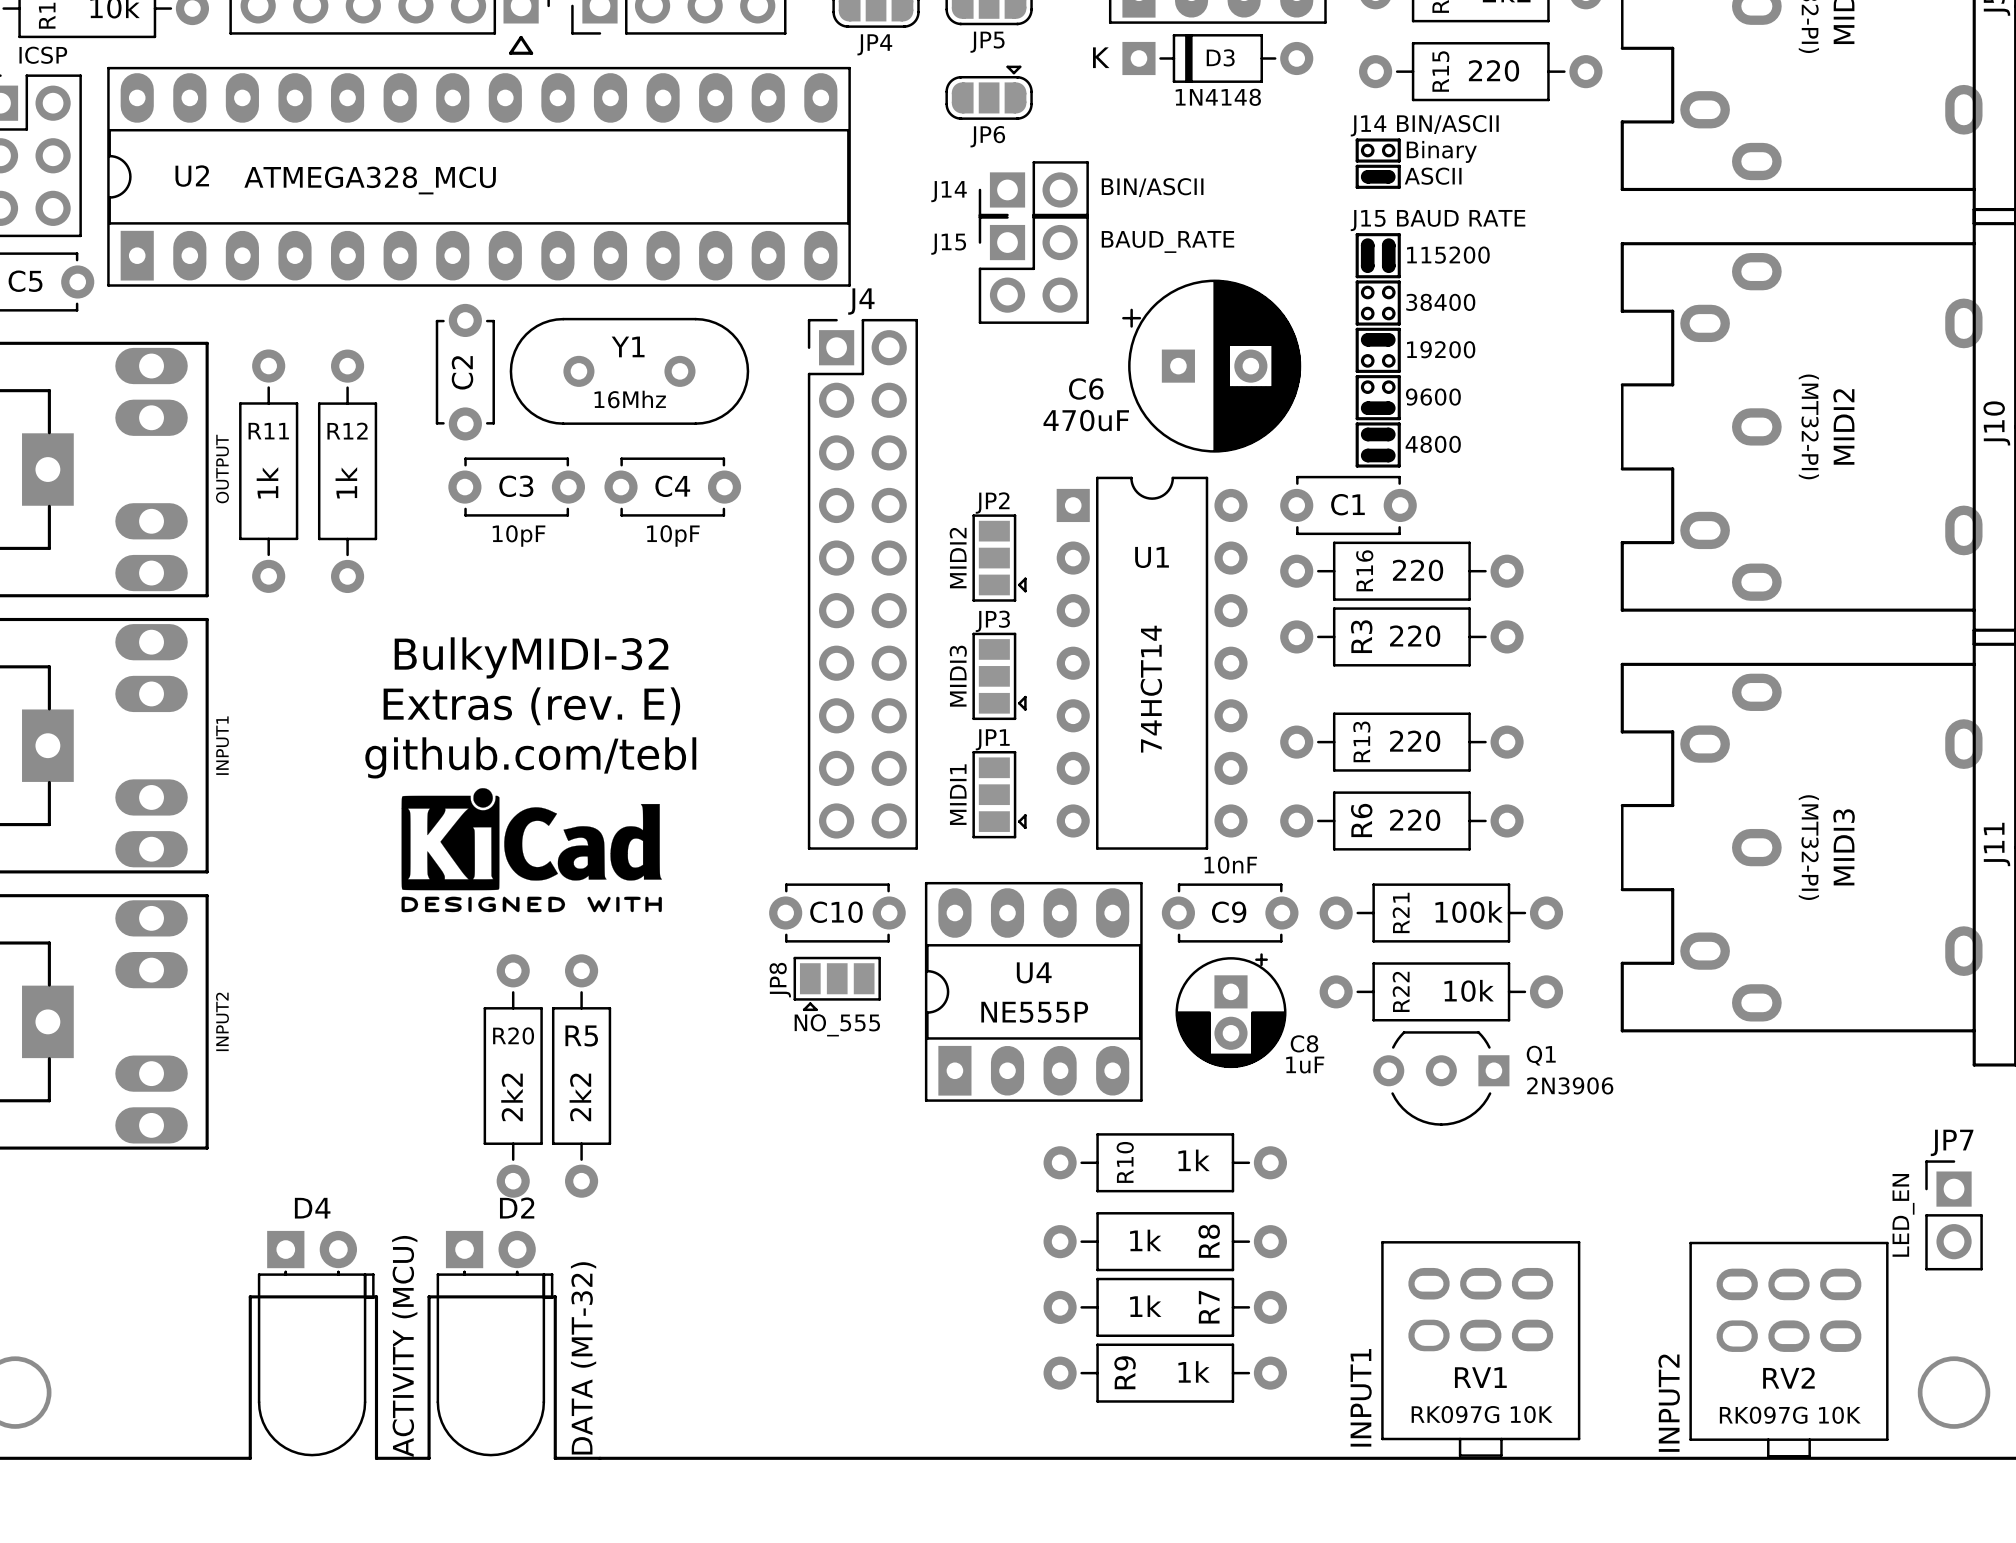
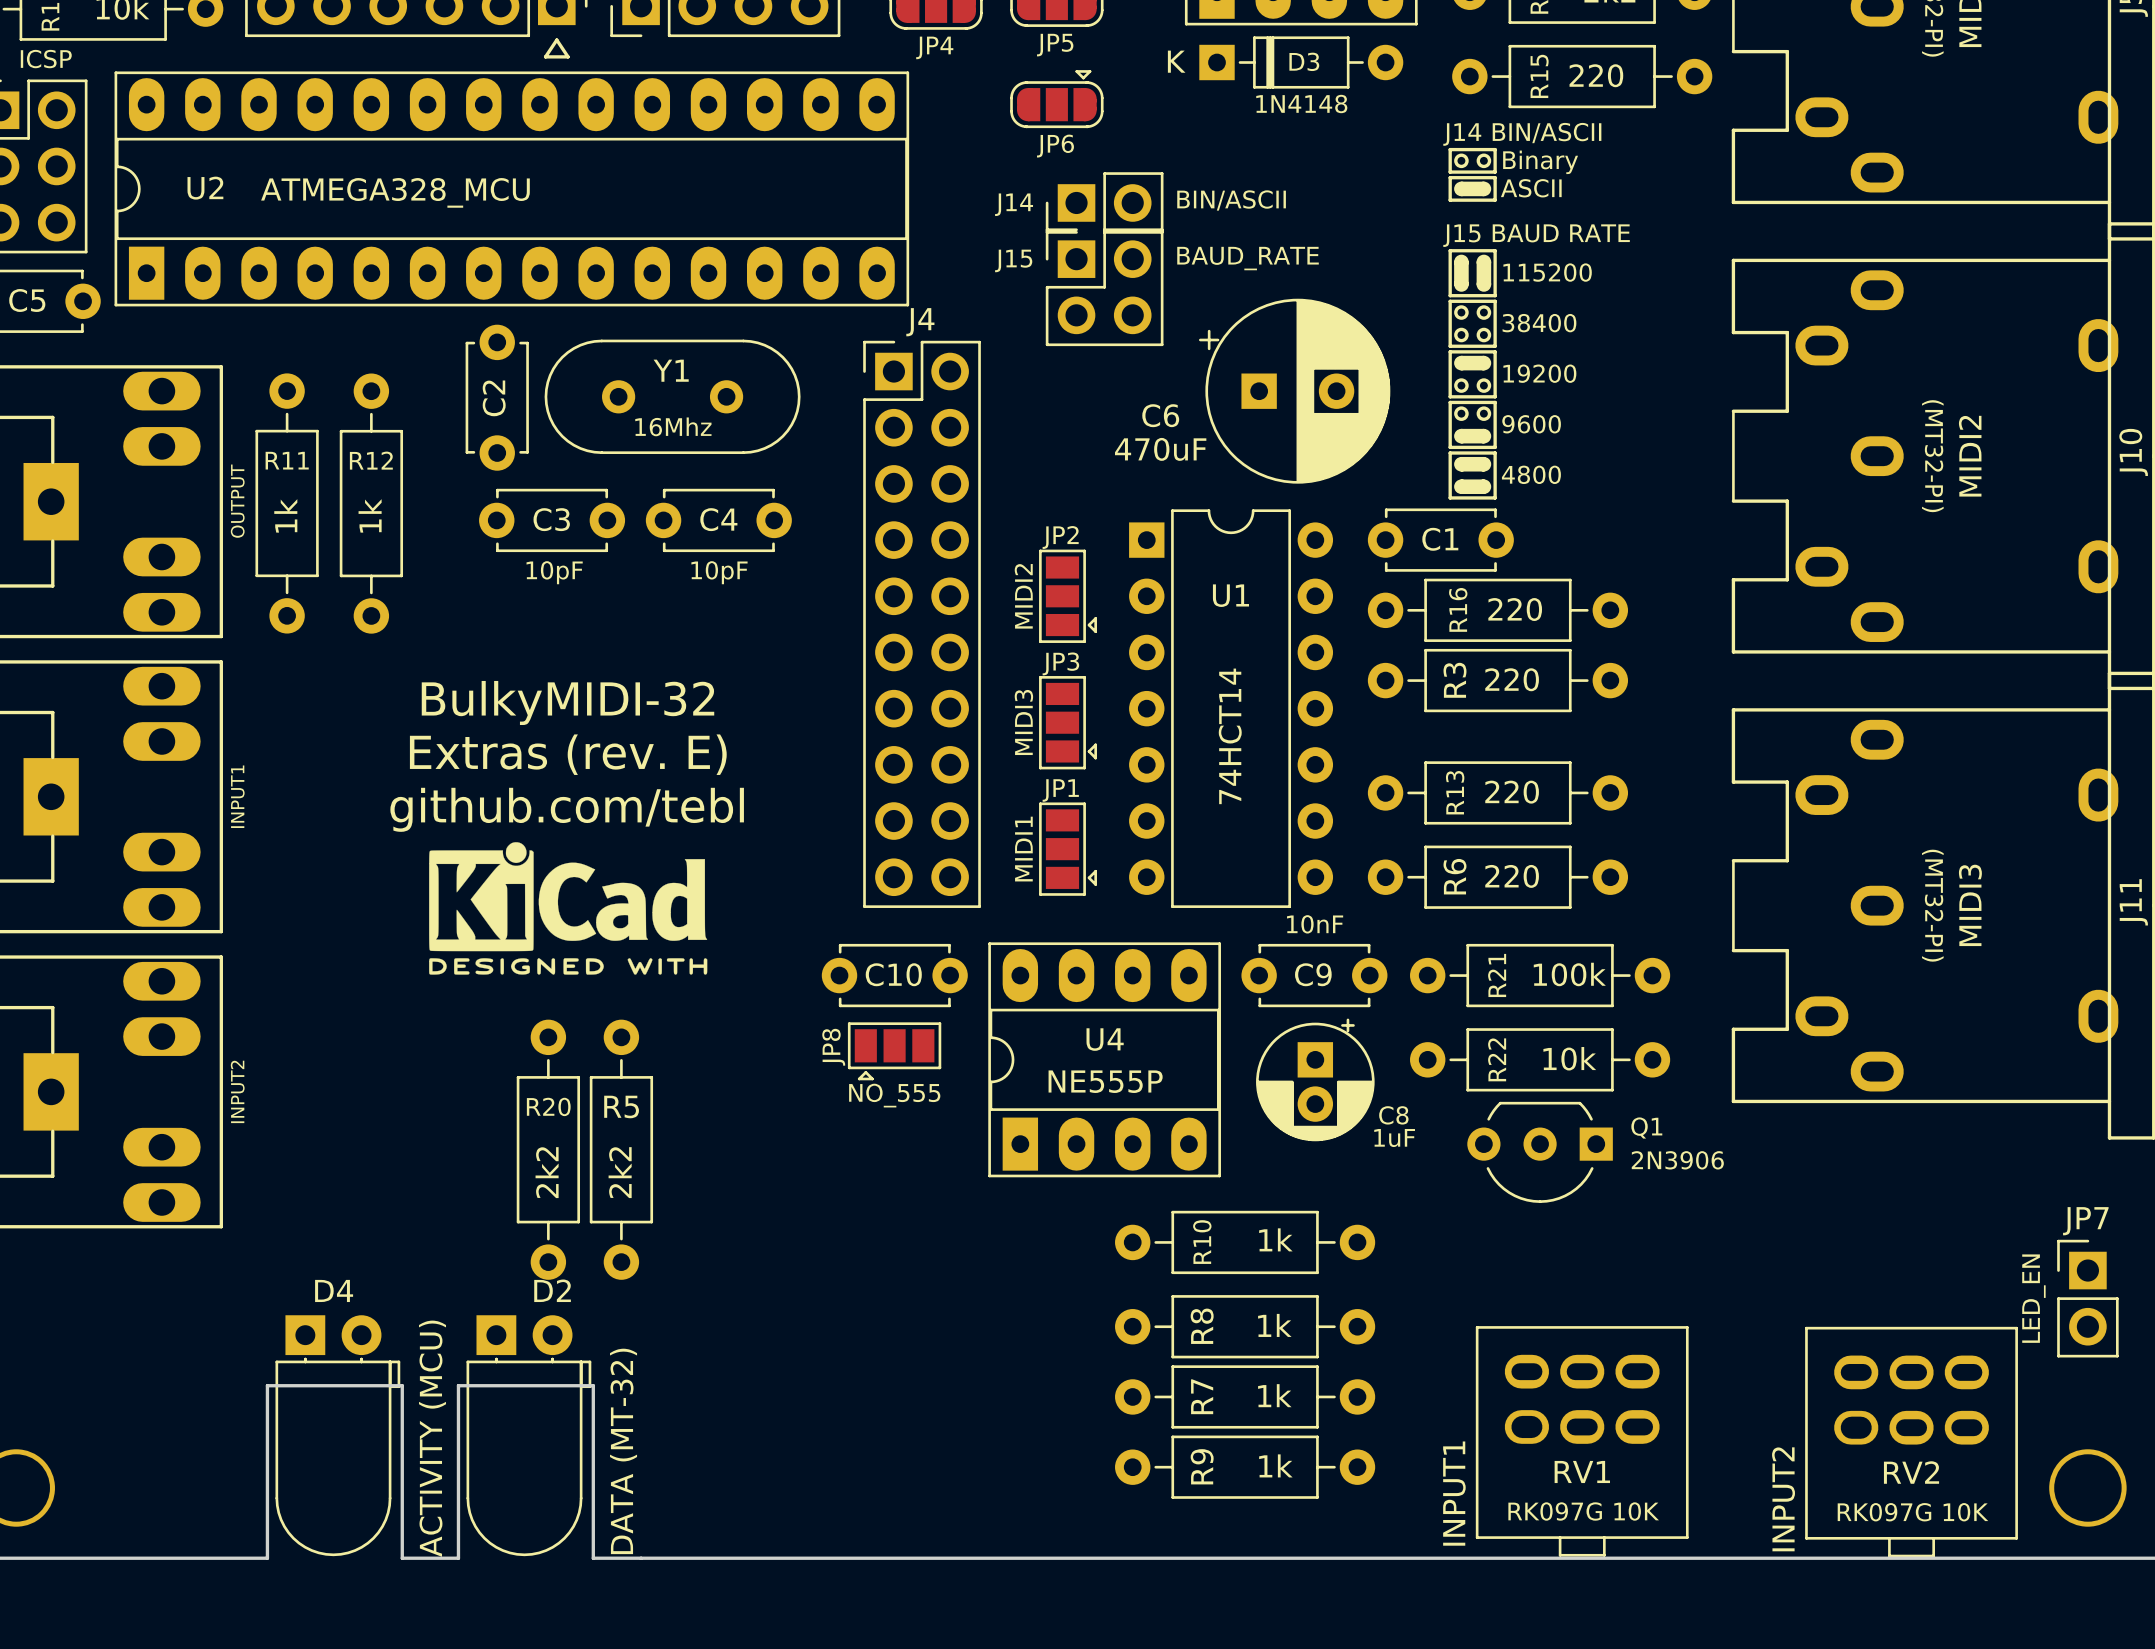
R8 value position: 1k (1145, 1240) -> 1k (1274, 1325)
R8 name position: R8 (1209, 1241) -> R8 (1202, 1326)
R7 value position: 1k (1145, 1306) -> 1k (1274, 1395)
R7 name position: R7 (1209, 1307) -> R7 (1202, 1396)

